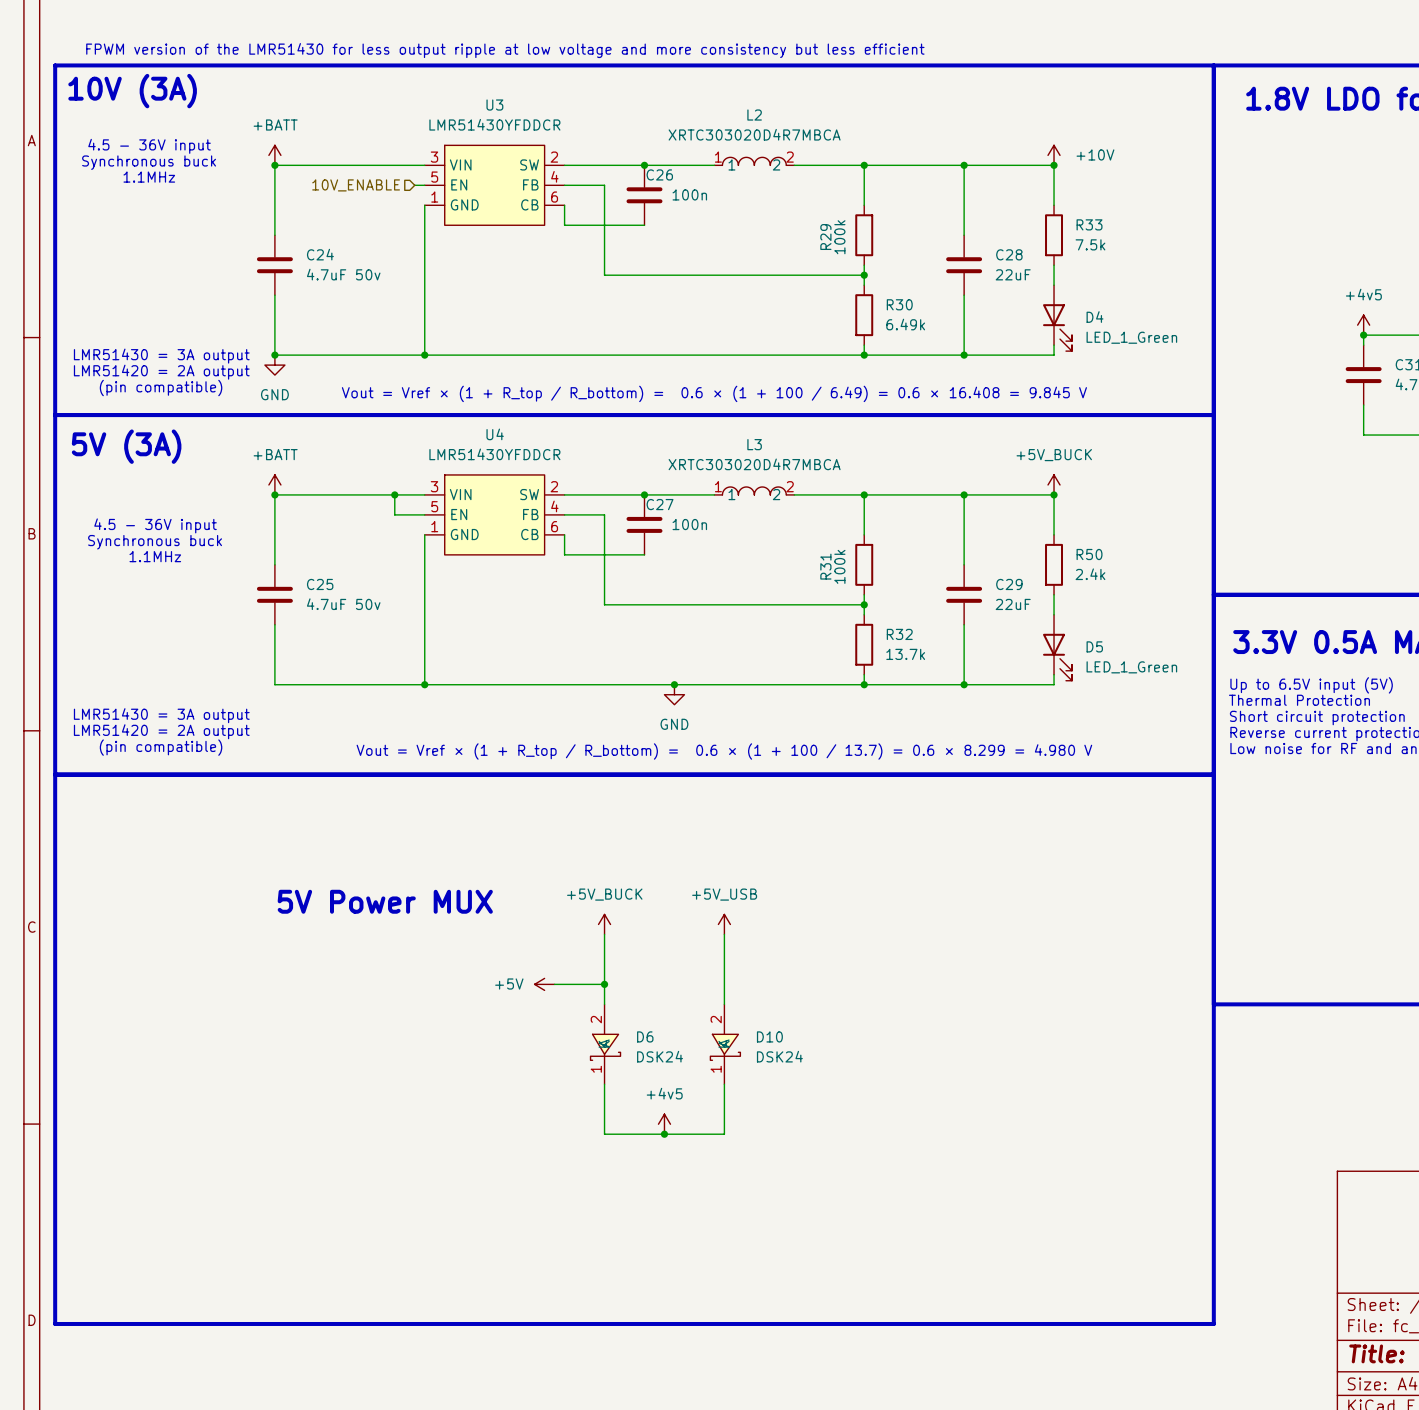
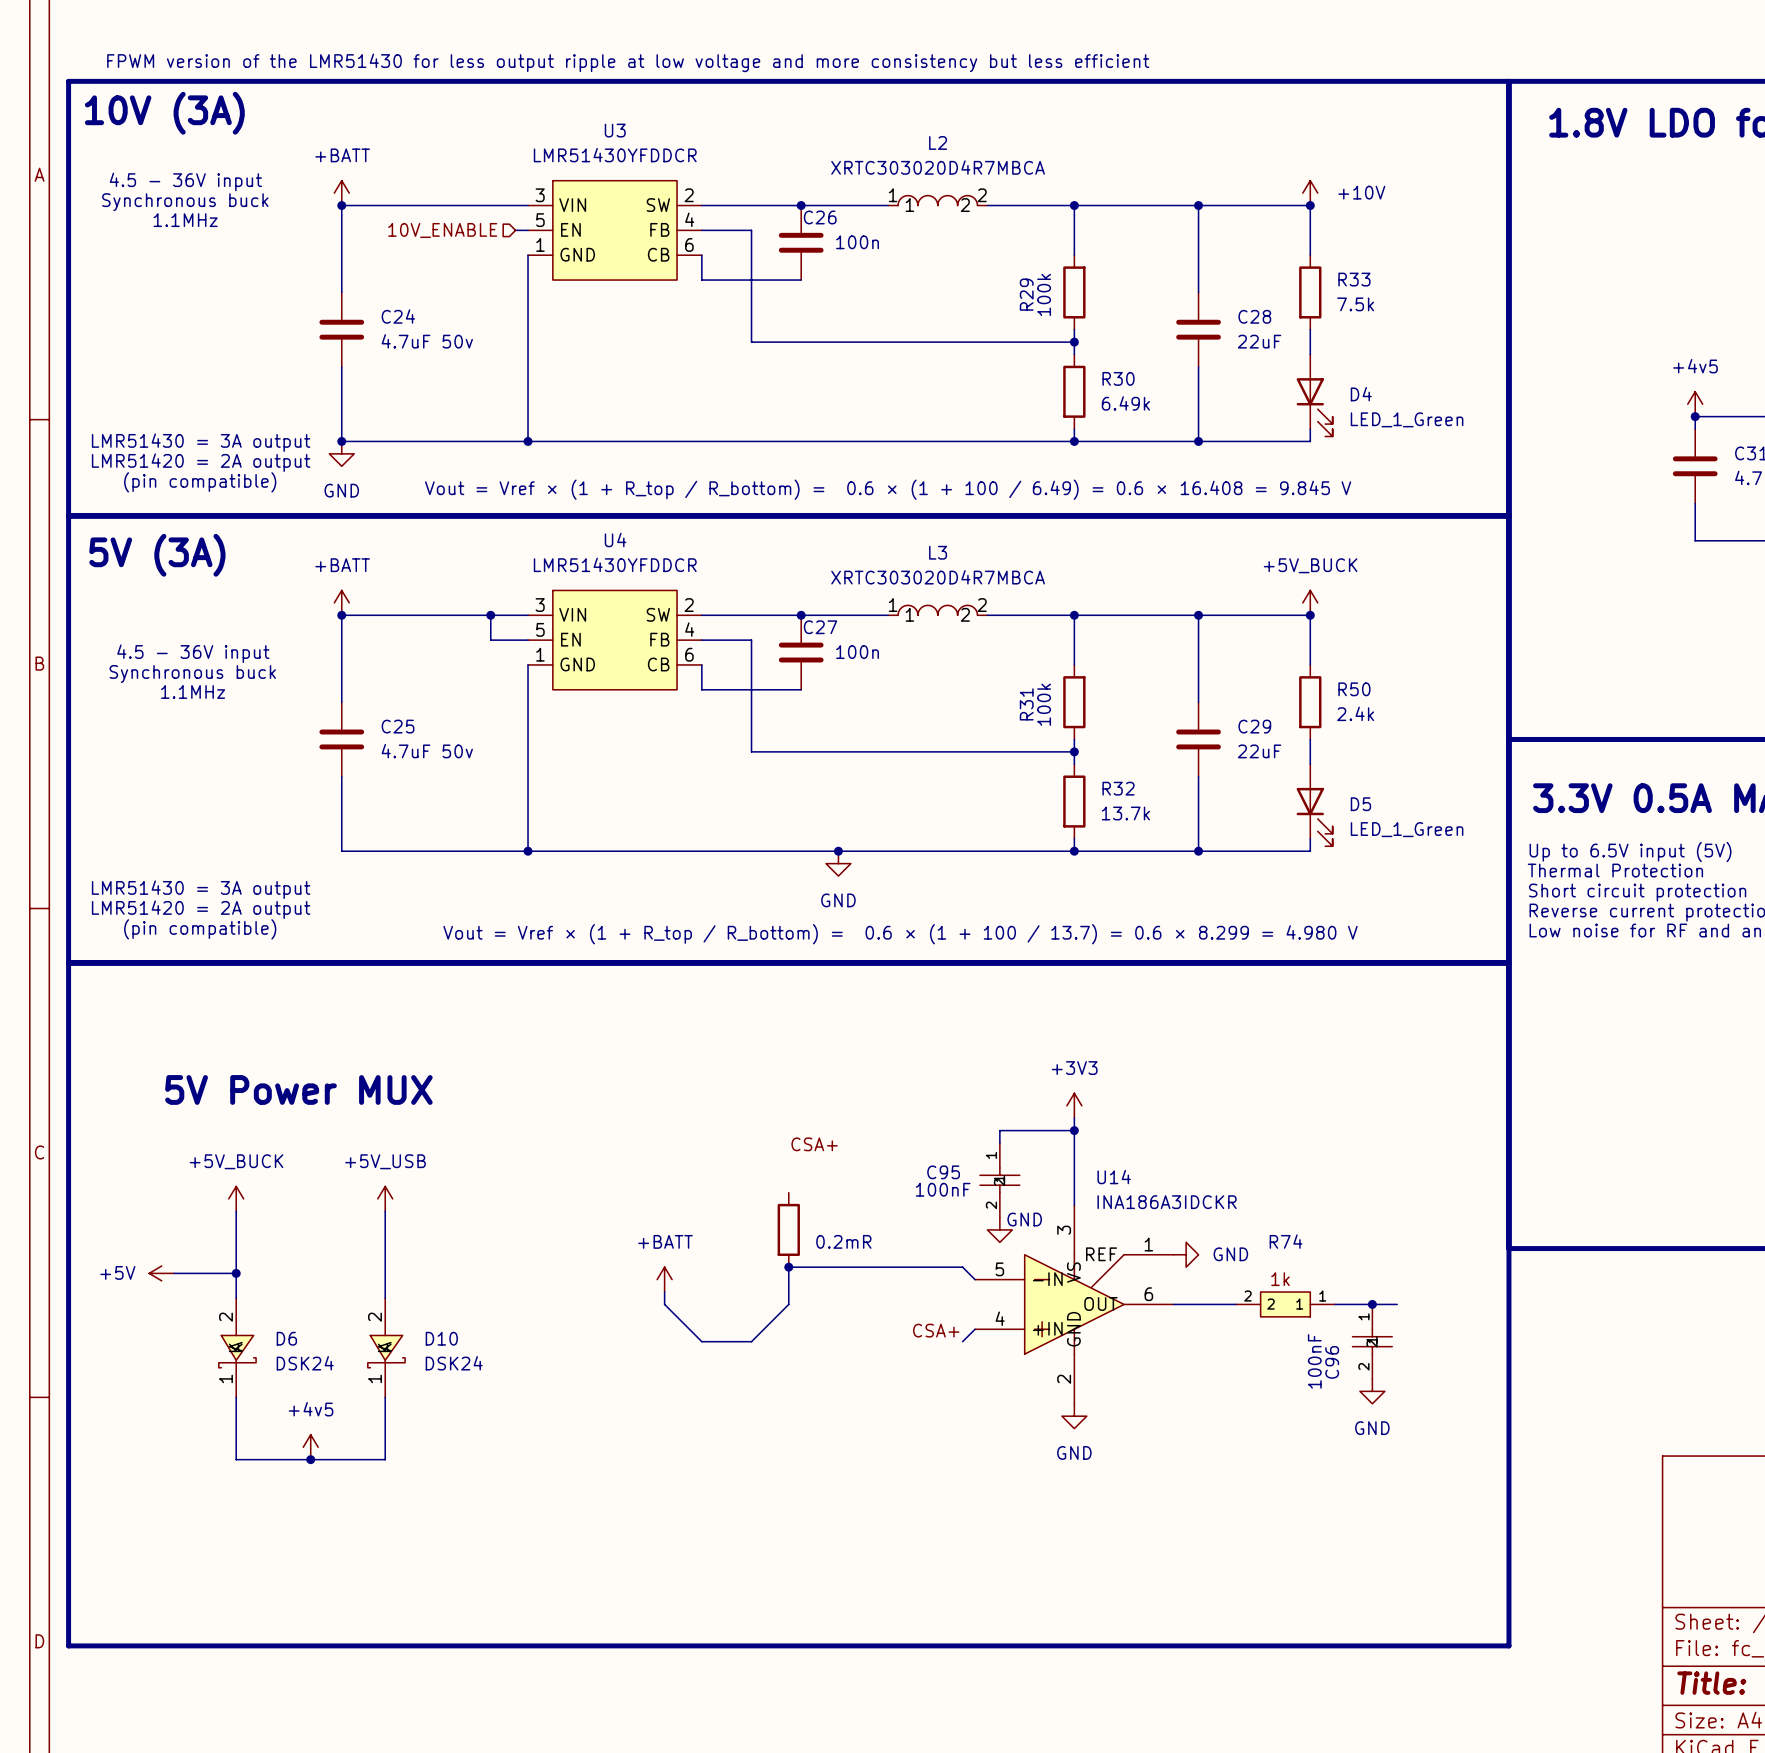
power symbol: none -> +3V3 (1074, 1105)
text position: 5V Power MUX (385, 901) -> 5V Power MUX (298, 1089)
wire: none -> (1074, 1130) (999, 1130) (999, 1143)
junction: none -> (1074, 1130)
label: none -> CSA+ (814, 1144)
power symbol: +5V_BUCK (604, 924) -> none
power symbol: +5V_USB (724, 924) -> none
wire: (604, 934) (604, 1004) -> none
wire: (724, 934) (724, 1004) -> (1074, 1118) (1074, 1205)
C95: none -> 100nF (999, 1180)
power symbol: none -> +5V_BUCK (236, 1198)
power symbol: none -> +5V_USB (385, 1198)
wire: none -> (236, 1211) (236, 1298)
wire: none -> (385, 1211) (385, 1298)
power symbol: +5V (544, 984) -> none
wire: (554, 984) (604, 984) -> none
junction position: (604, 984) -> (788, 1267)
part: none -> 0.2mR (788, 1229)
power symbol: none -> GND (999, 1229)
power symbol: none -> GND (1186, 1254)
power symbol: none -> +5V (161, 1273)
wire: none -> (174, 1273) (236, 1273)
junction: none -> (236, 1273)
power symbol: none -> +BATT (664, 1279)
wire: none -> (975, 1279) (962, 1267) (788, 1267) (788, 1304) (751, 1341) (701, 1341) (664, 1304) (664, 1292)
D6 position: (605, 1044) -> (237, 1347)
D10 position: (725, 1044) -> (386, 1347)
U14: none -> INA186A3IDCKR (1074, 1304)
wire: none -> (1173, 1304) (1235, 1304)
R74: none -> (1285, 1304)
wire: none -> (1335, 1304) (1397, 1304)
junction: none -> (1372, 1304)
wire: none -> (975, 1329) (962, 1341)
label: none -> CSA+ (936, 1330)
C96: none -> 100nF (1372, 1341)
wire: (604, 1084) (604, 1134) (724, 1134) (724, 1084) -> none
power symbol: none -> GND (1372, 1391)
wire: none -> (236, 1397) (236, 1459) (385, 1459) (385, 1397)
power symbol: +4v5 (664, 1124) -> none
junction: (664, 1134) -> none
power symbol: none -> GND (1074, 1416)
power symbol: none -> +4v5 (310, 1447)
junction: none -> (310, 1459)

